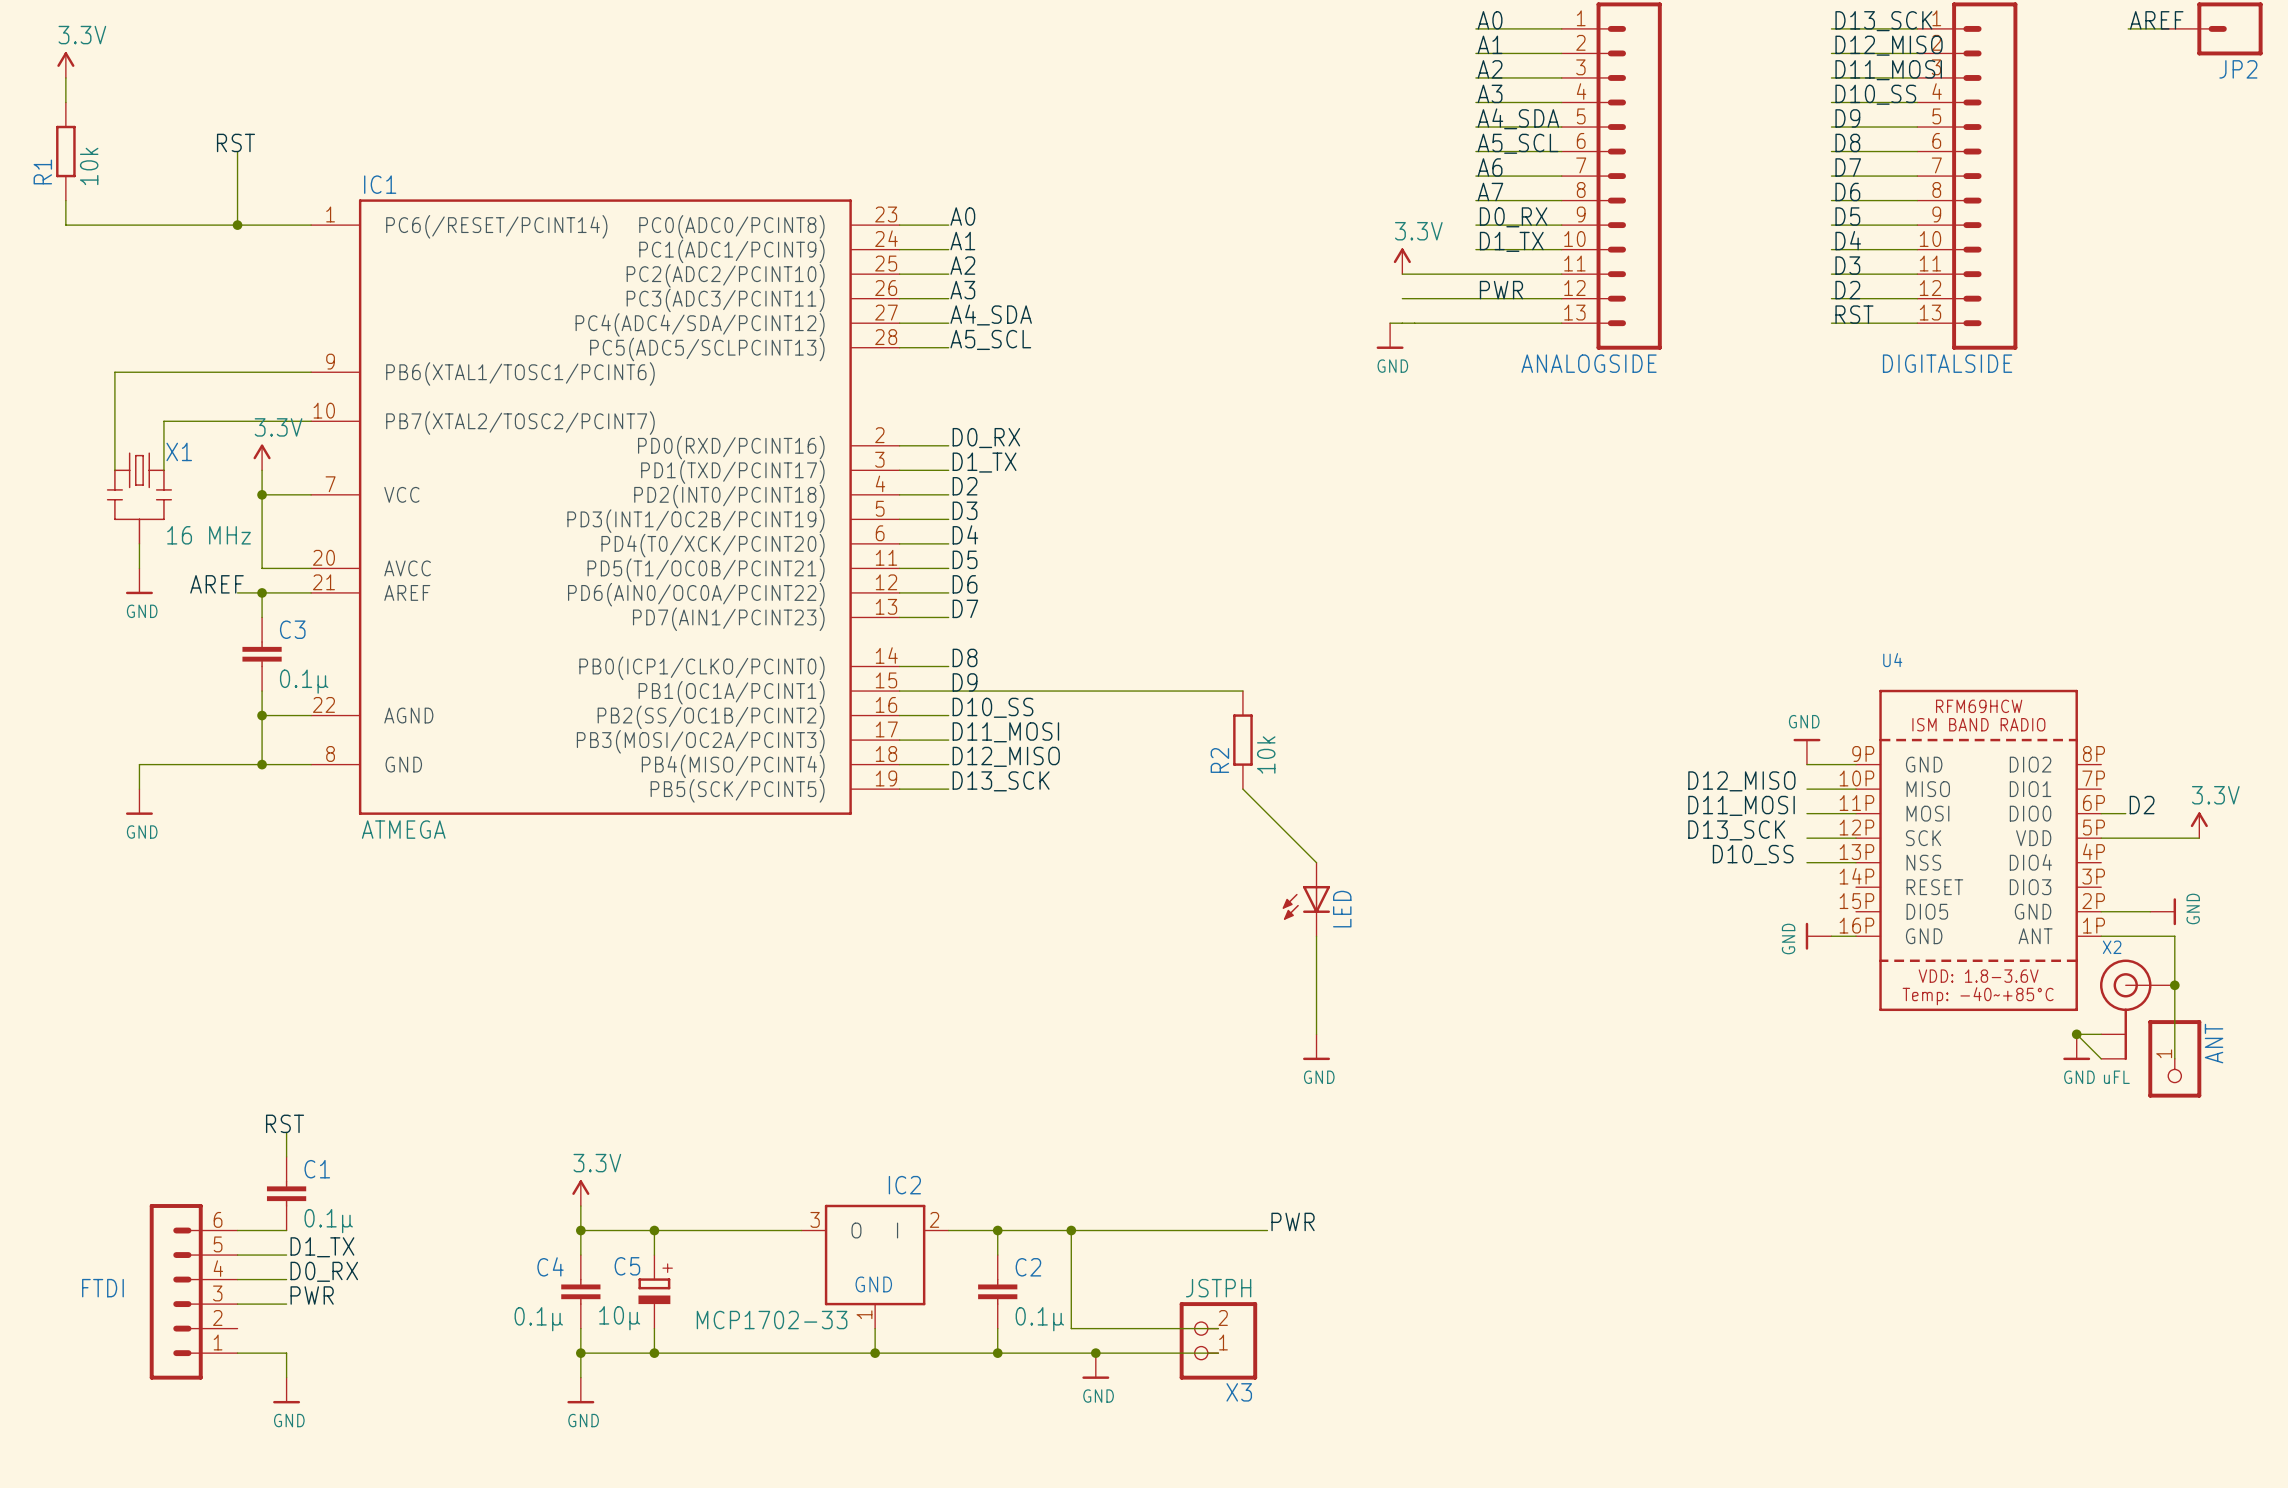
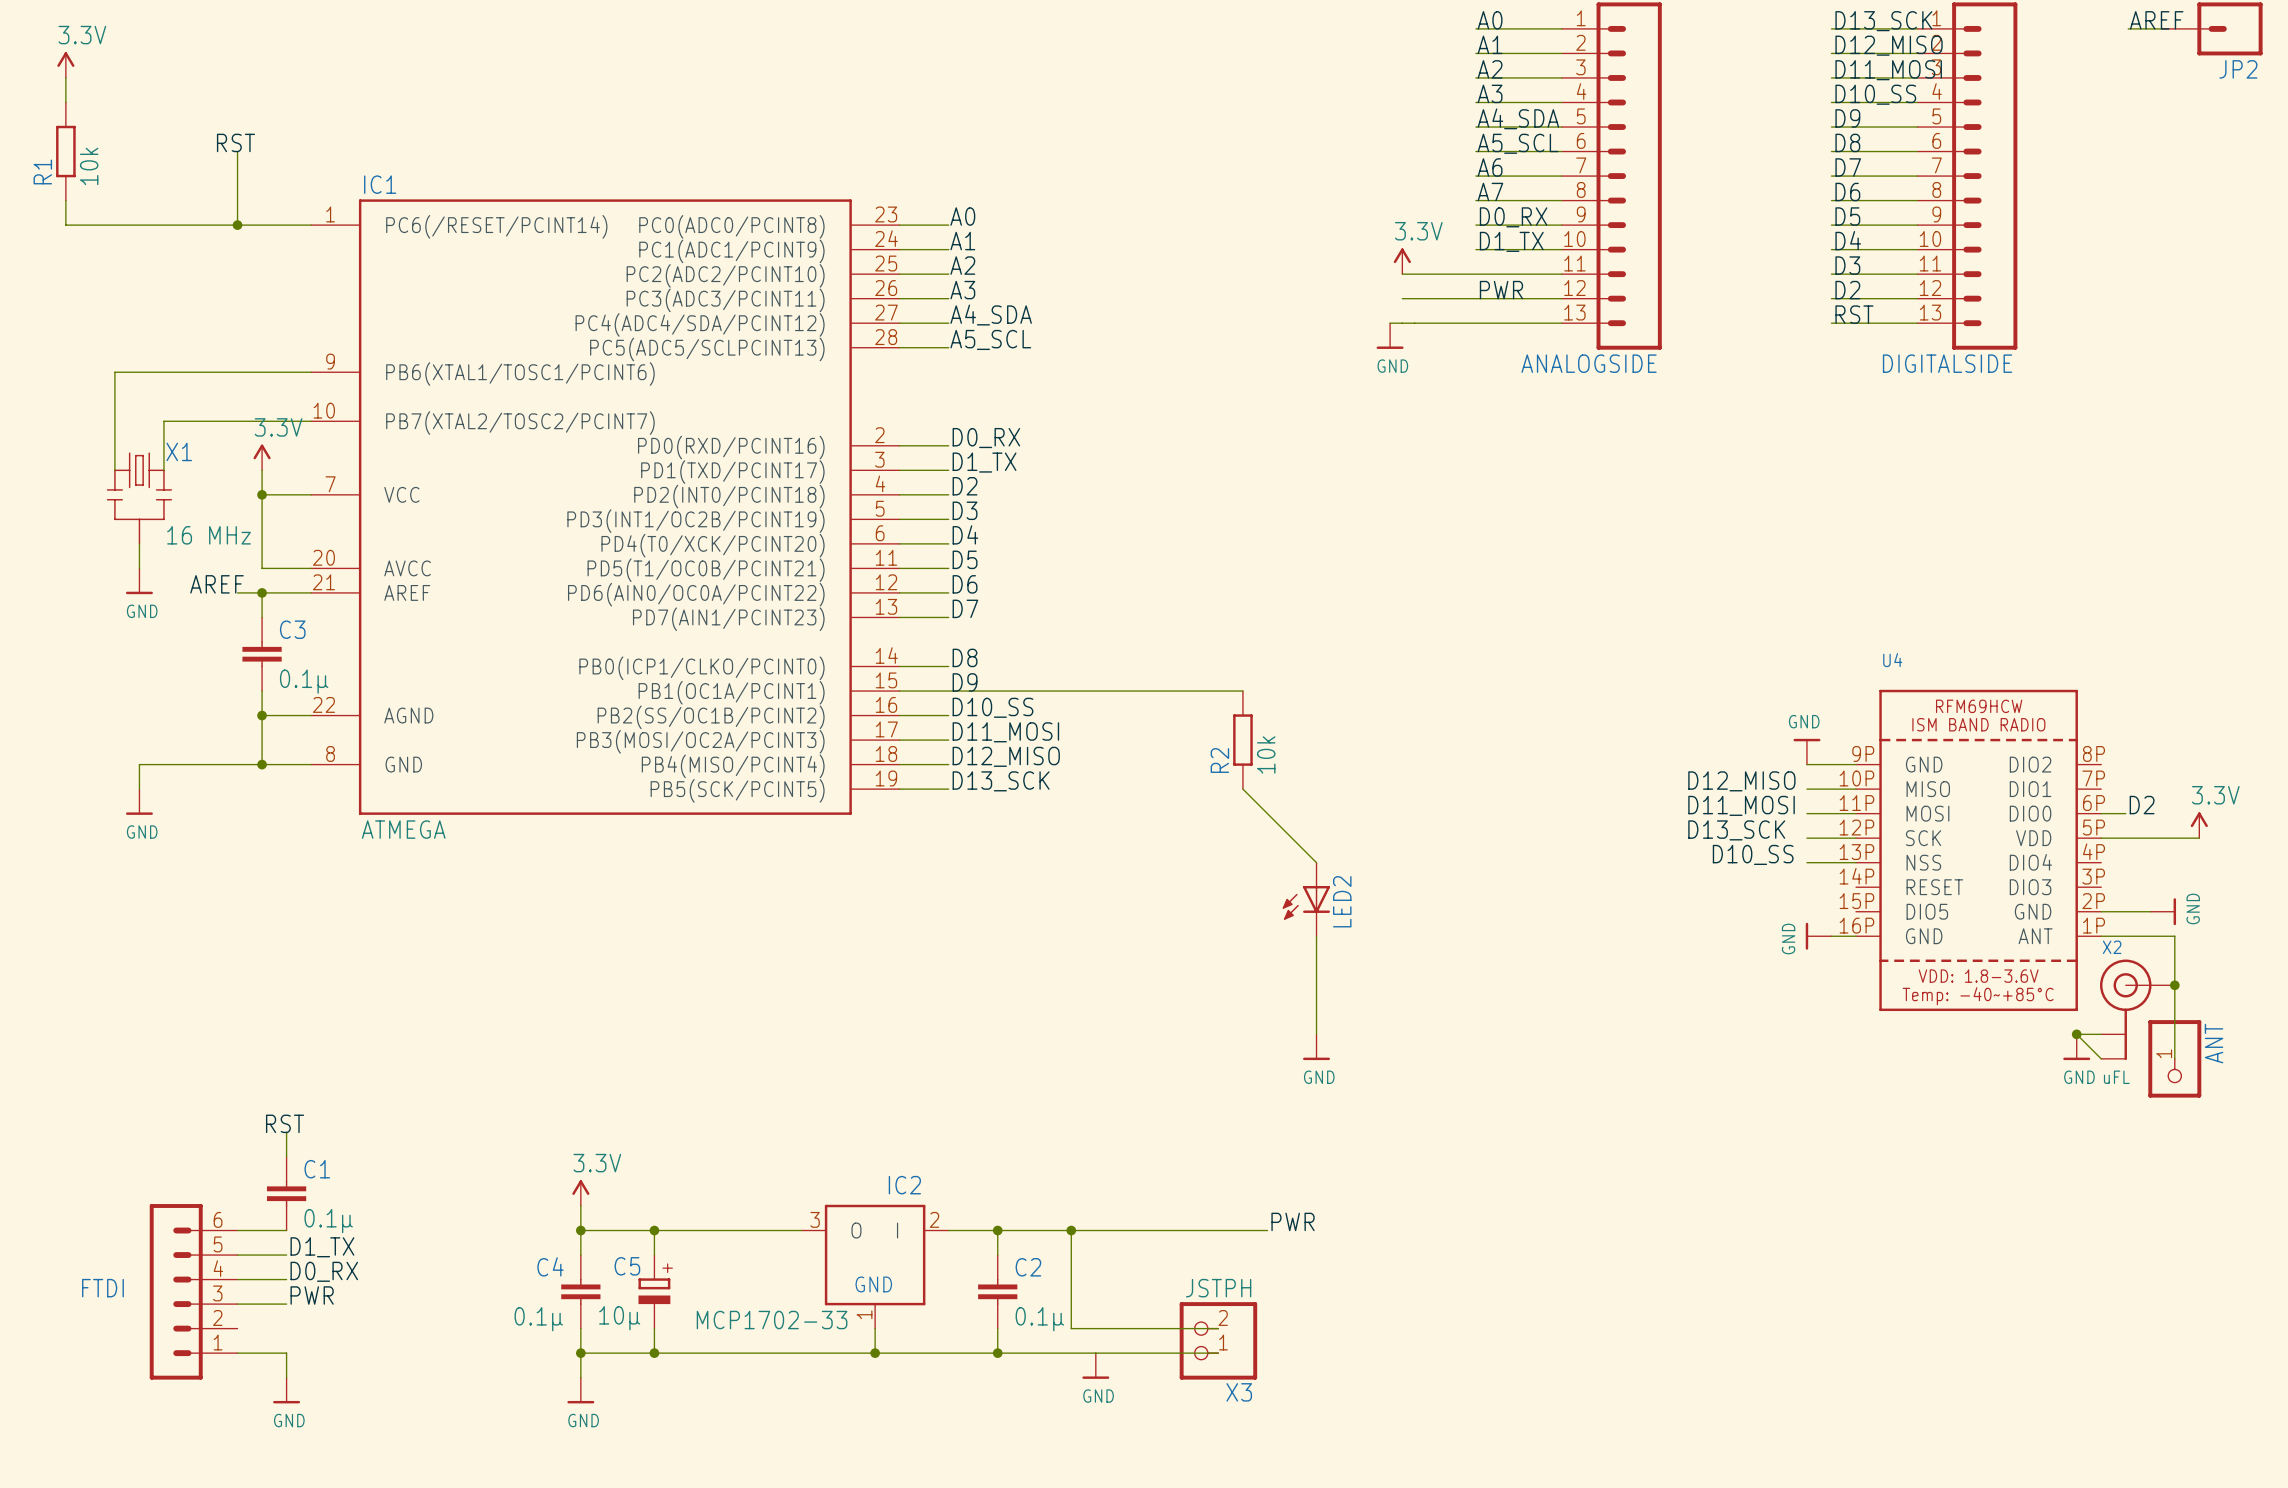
LED name: LED (1342, 909) -> LED2 (1342, 901)
junction: (1095, 1353) -> none

